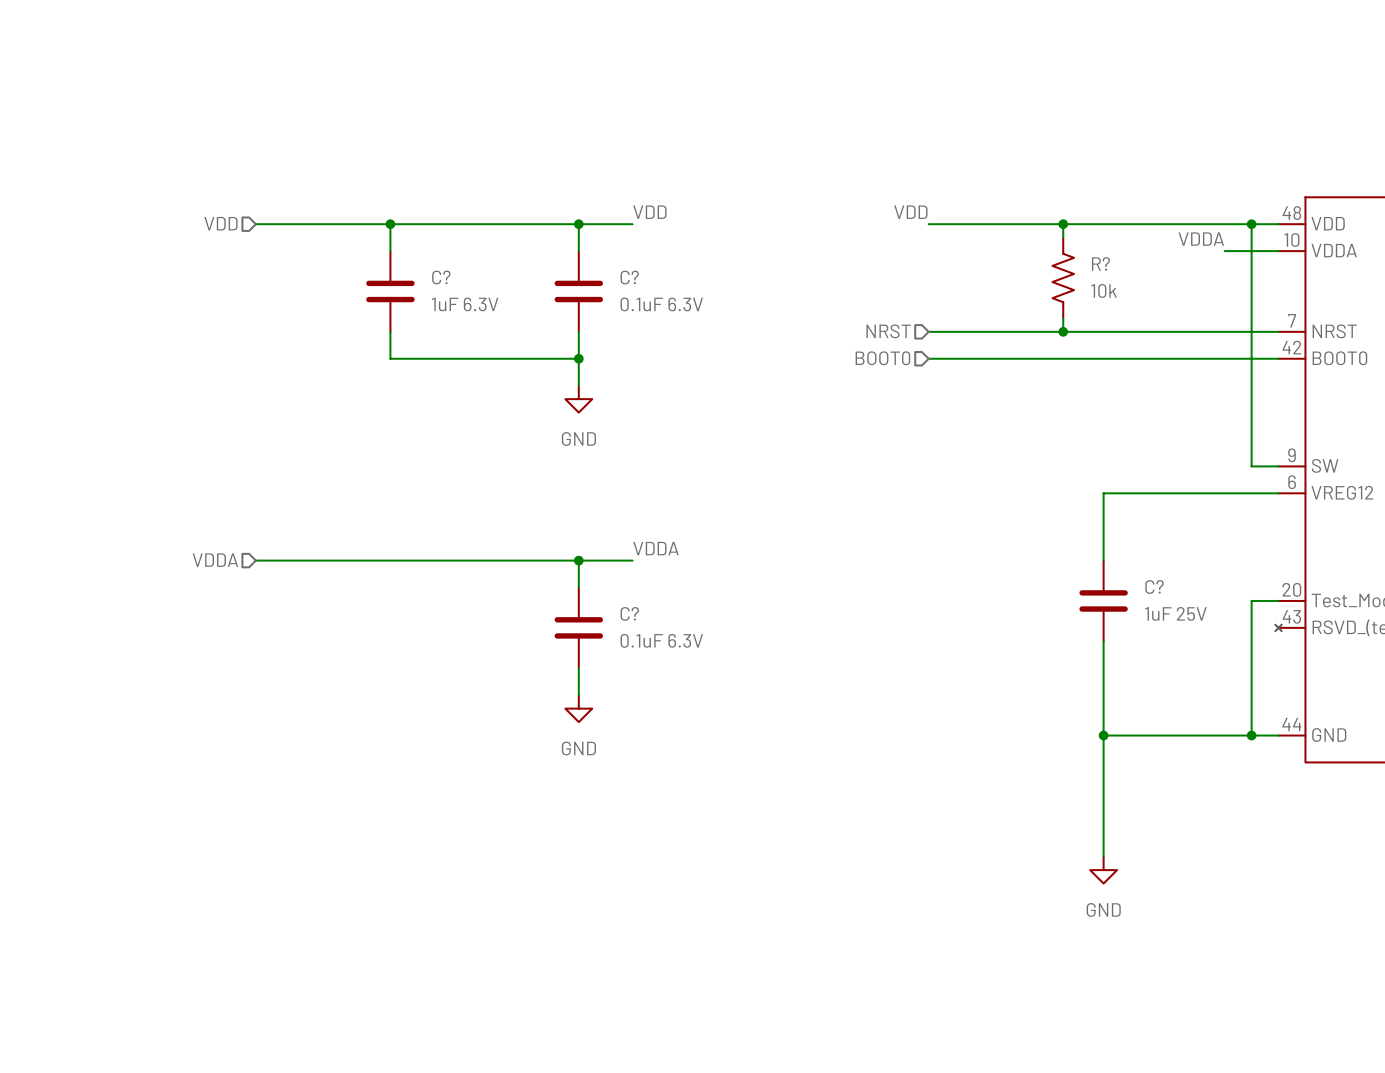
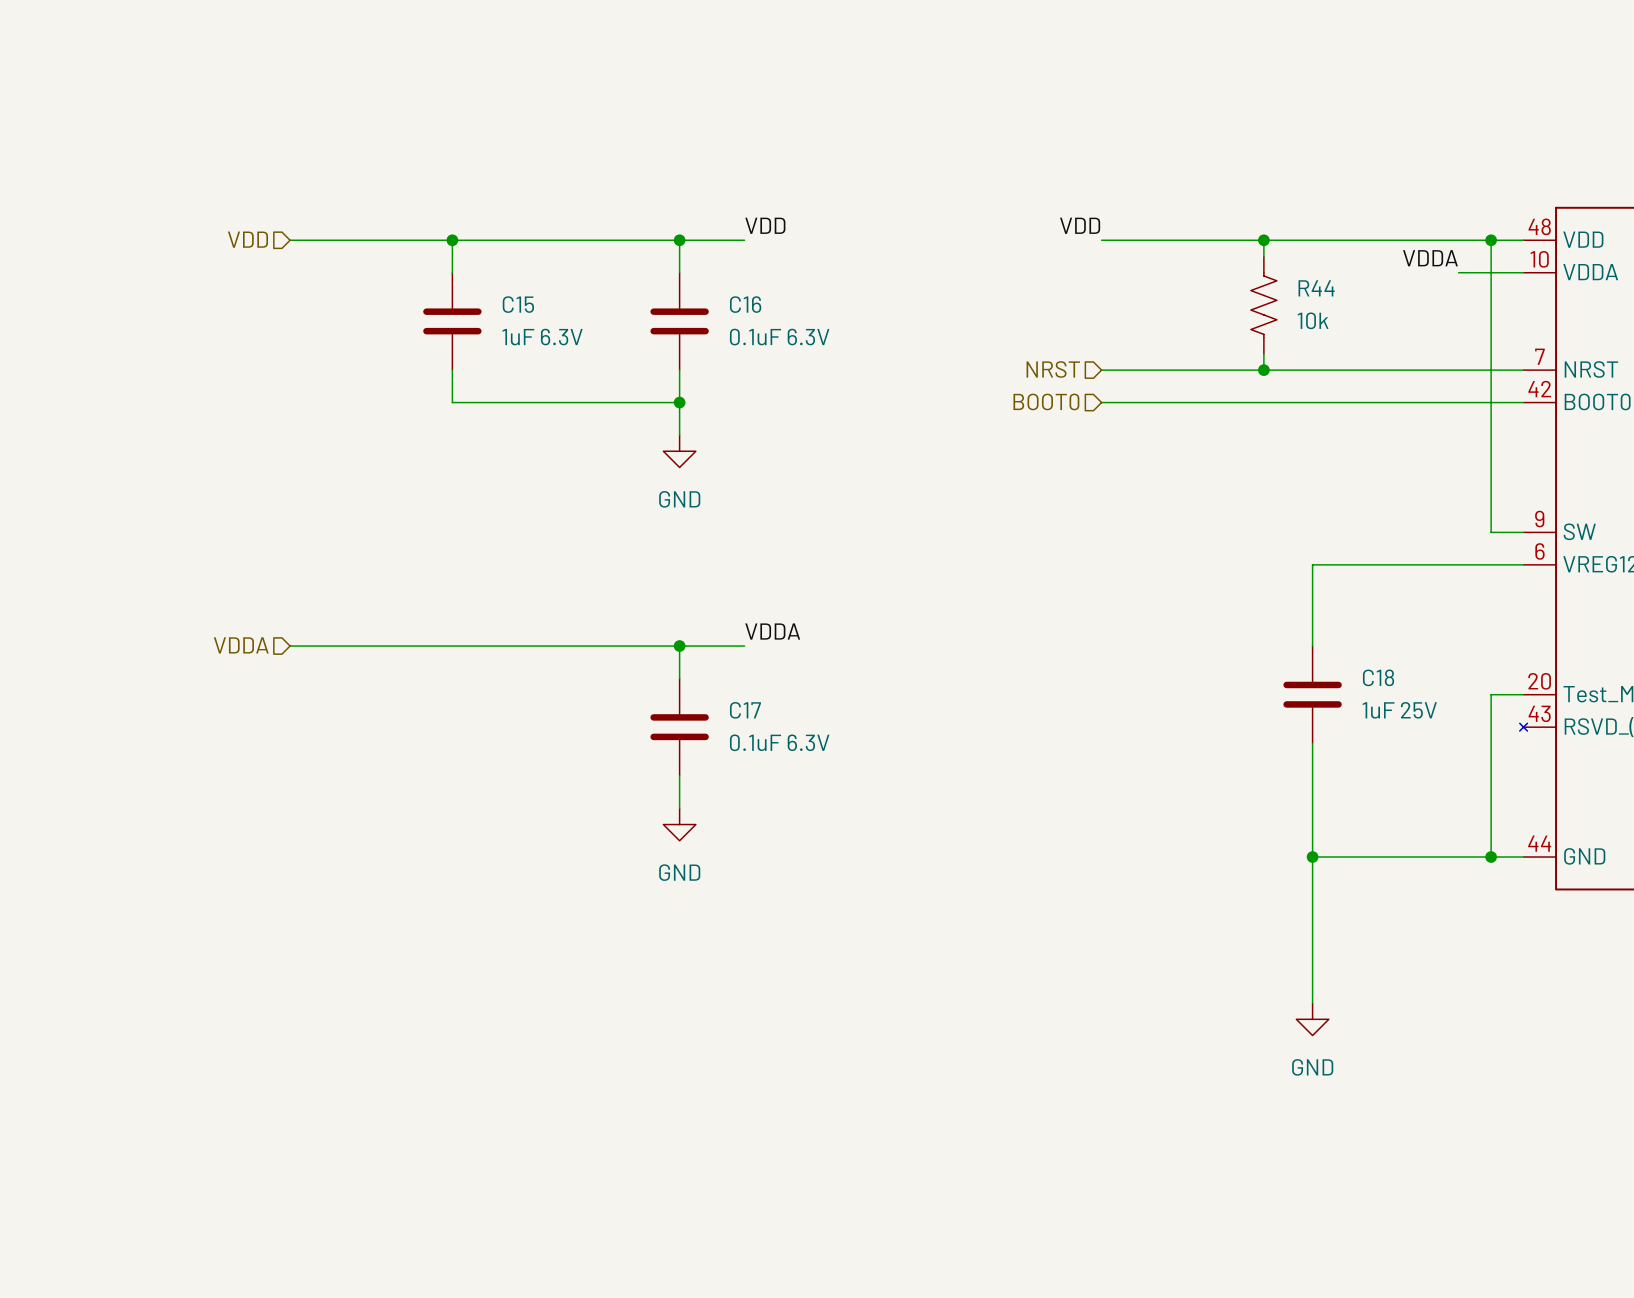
R? name: R? (1100, 263) -> R44 (1316, 288)
C? name: C? (441, 277) -> C15 (518, 304)
C? name: C? (629, 277) -> C16 (745, 304)
C? name: C? (1154, 587) -> C18 (1378, 677)
C? name: C? (629, 613) -> C17 (745, 710)

